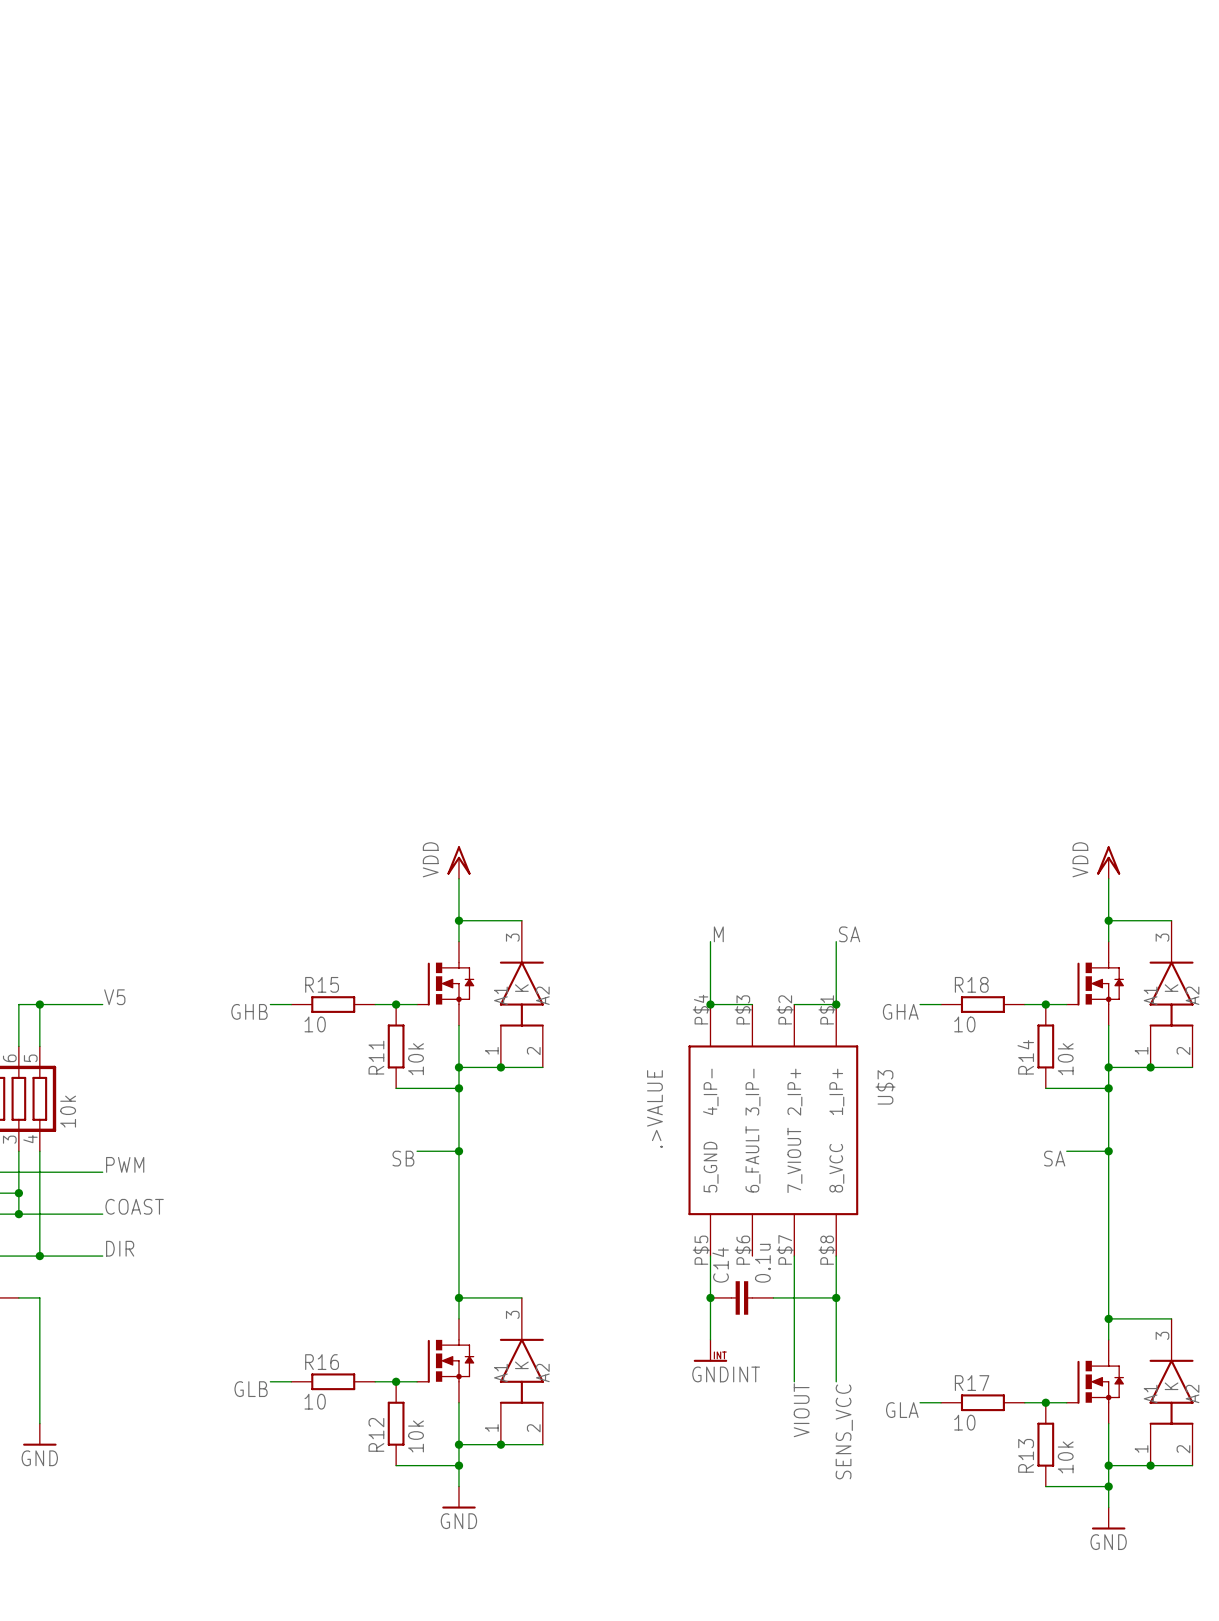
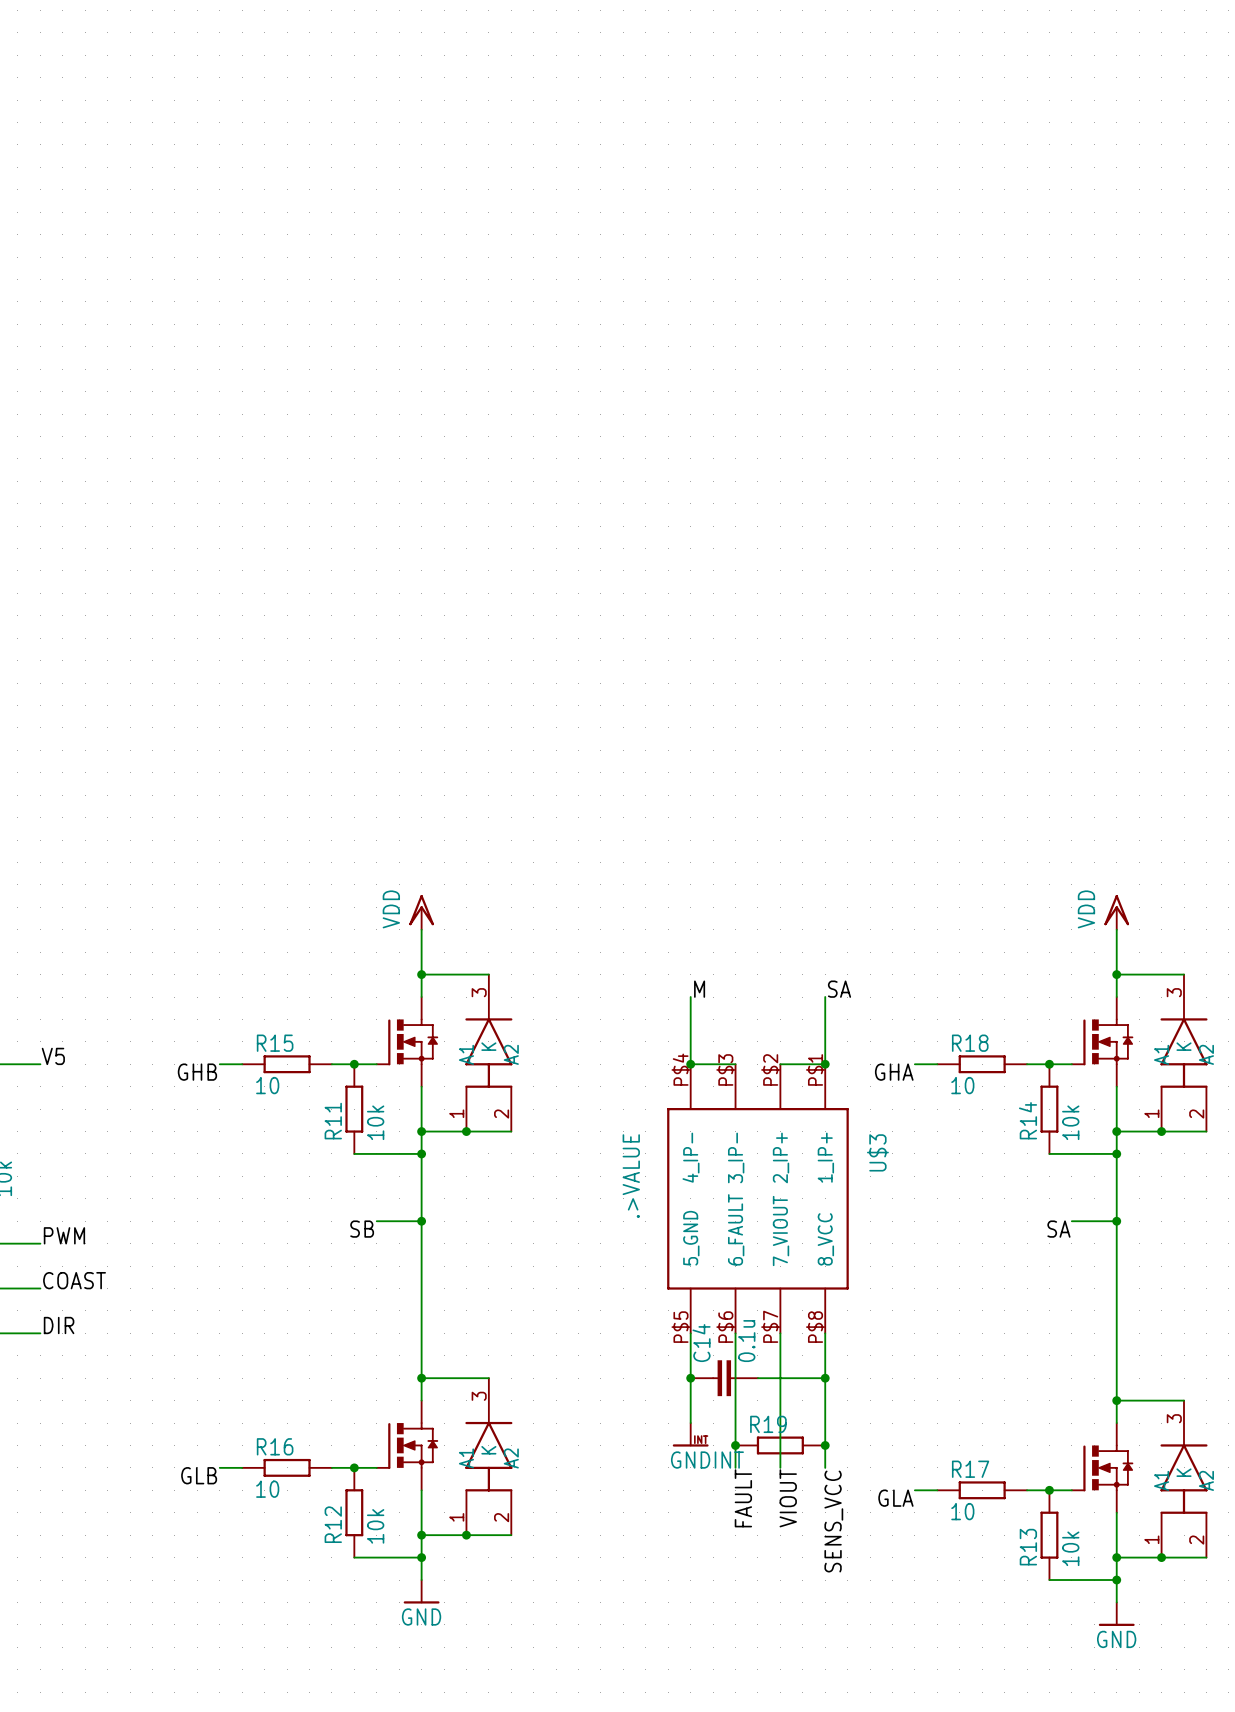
wire: none -> (735, 1333) (735, 1467)
junction: none -> (735, 1445)
R19: none -> (780, 1445)
junction: none -> (825, 1445)
label: none -> FAULT (743, 1498)

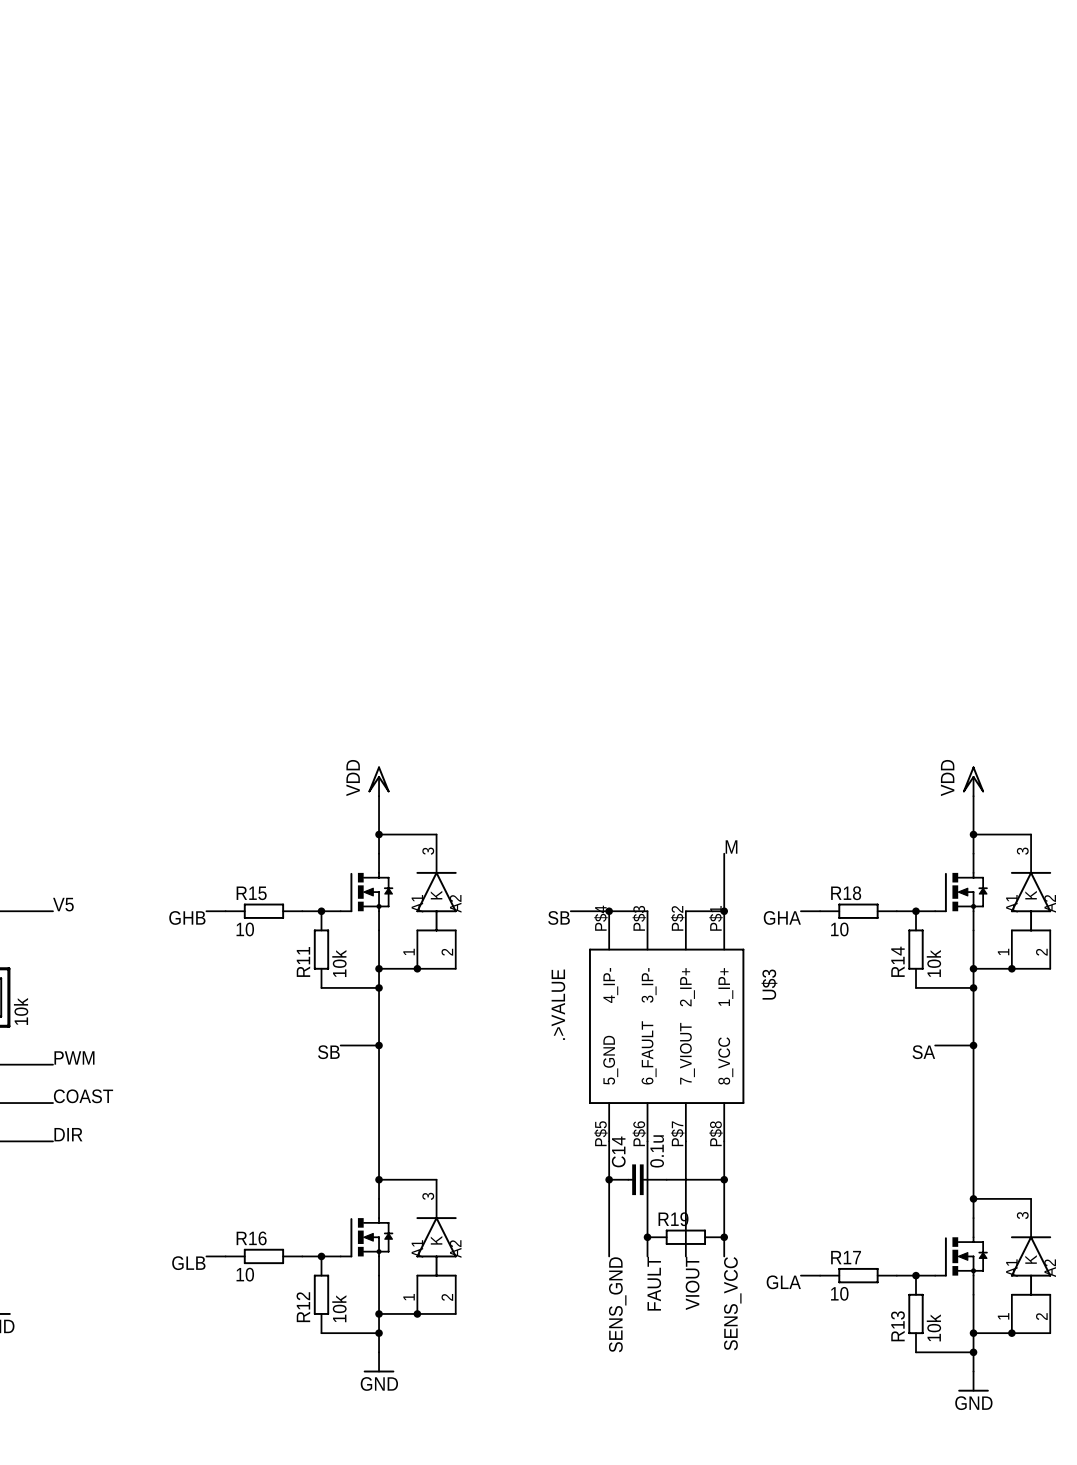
label: M (699, 989) -> none
label: SA (839, 989) -> M (731, 847)
wire: (690, 997) (690, 1064) -> (570, 911) (609, 911)
label: none -> SB (559, 917)
power symbol: GNDINT (690, 1434) -> none
label: none -> SENS_GND (617, 1304)

